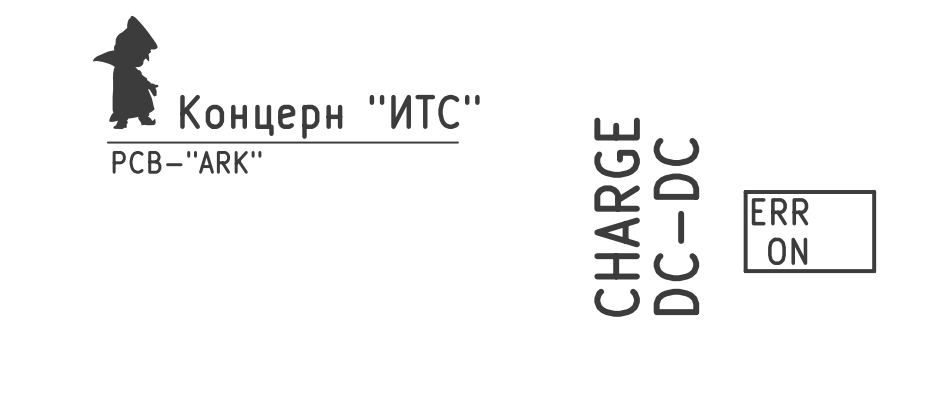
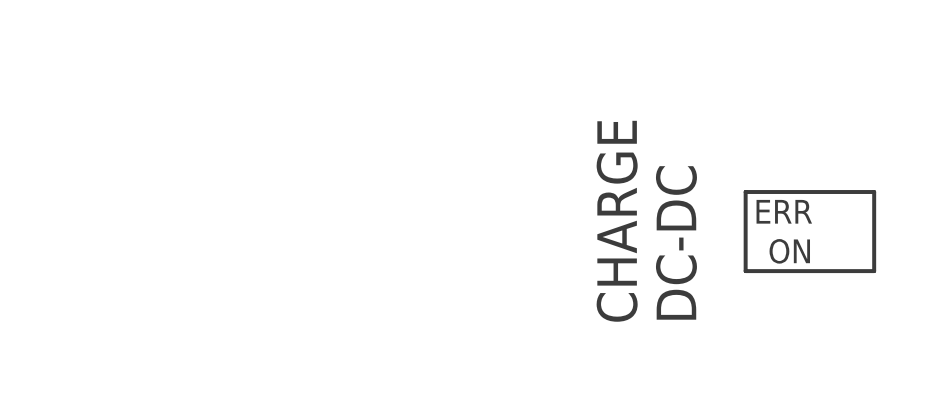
drawing: [93, 15, 459, 144] -> none

